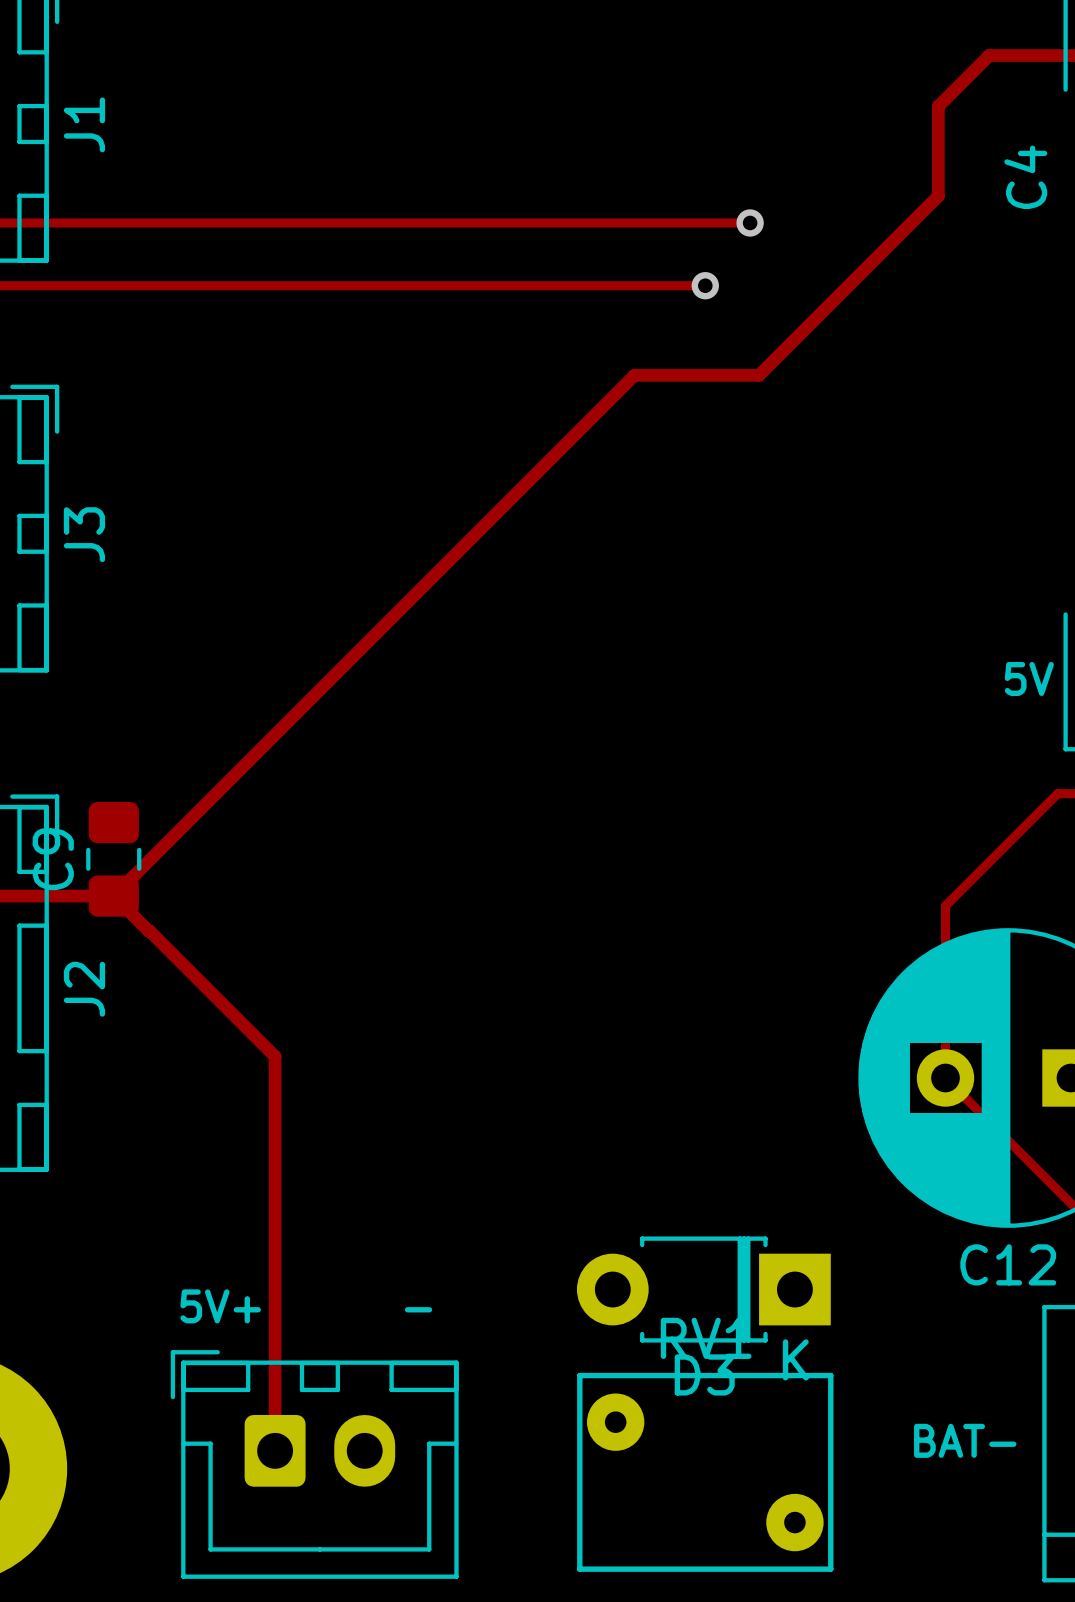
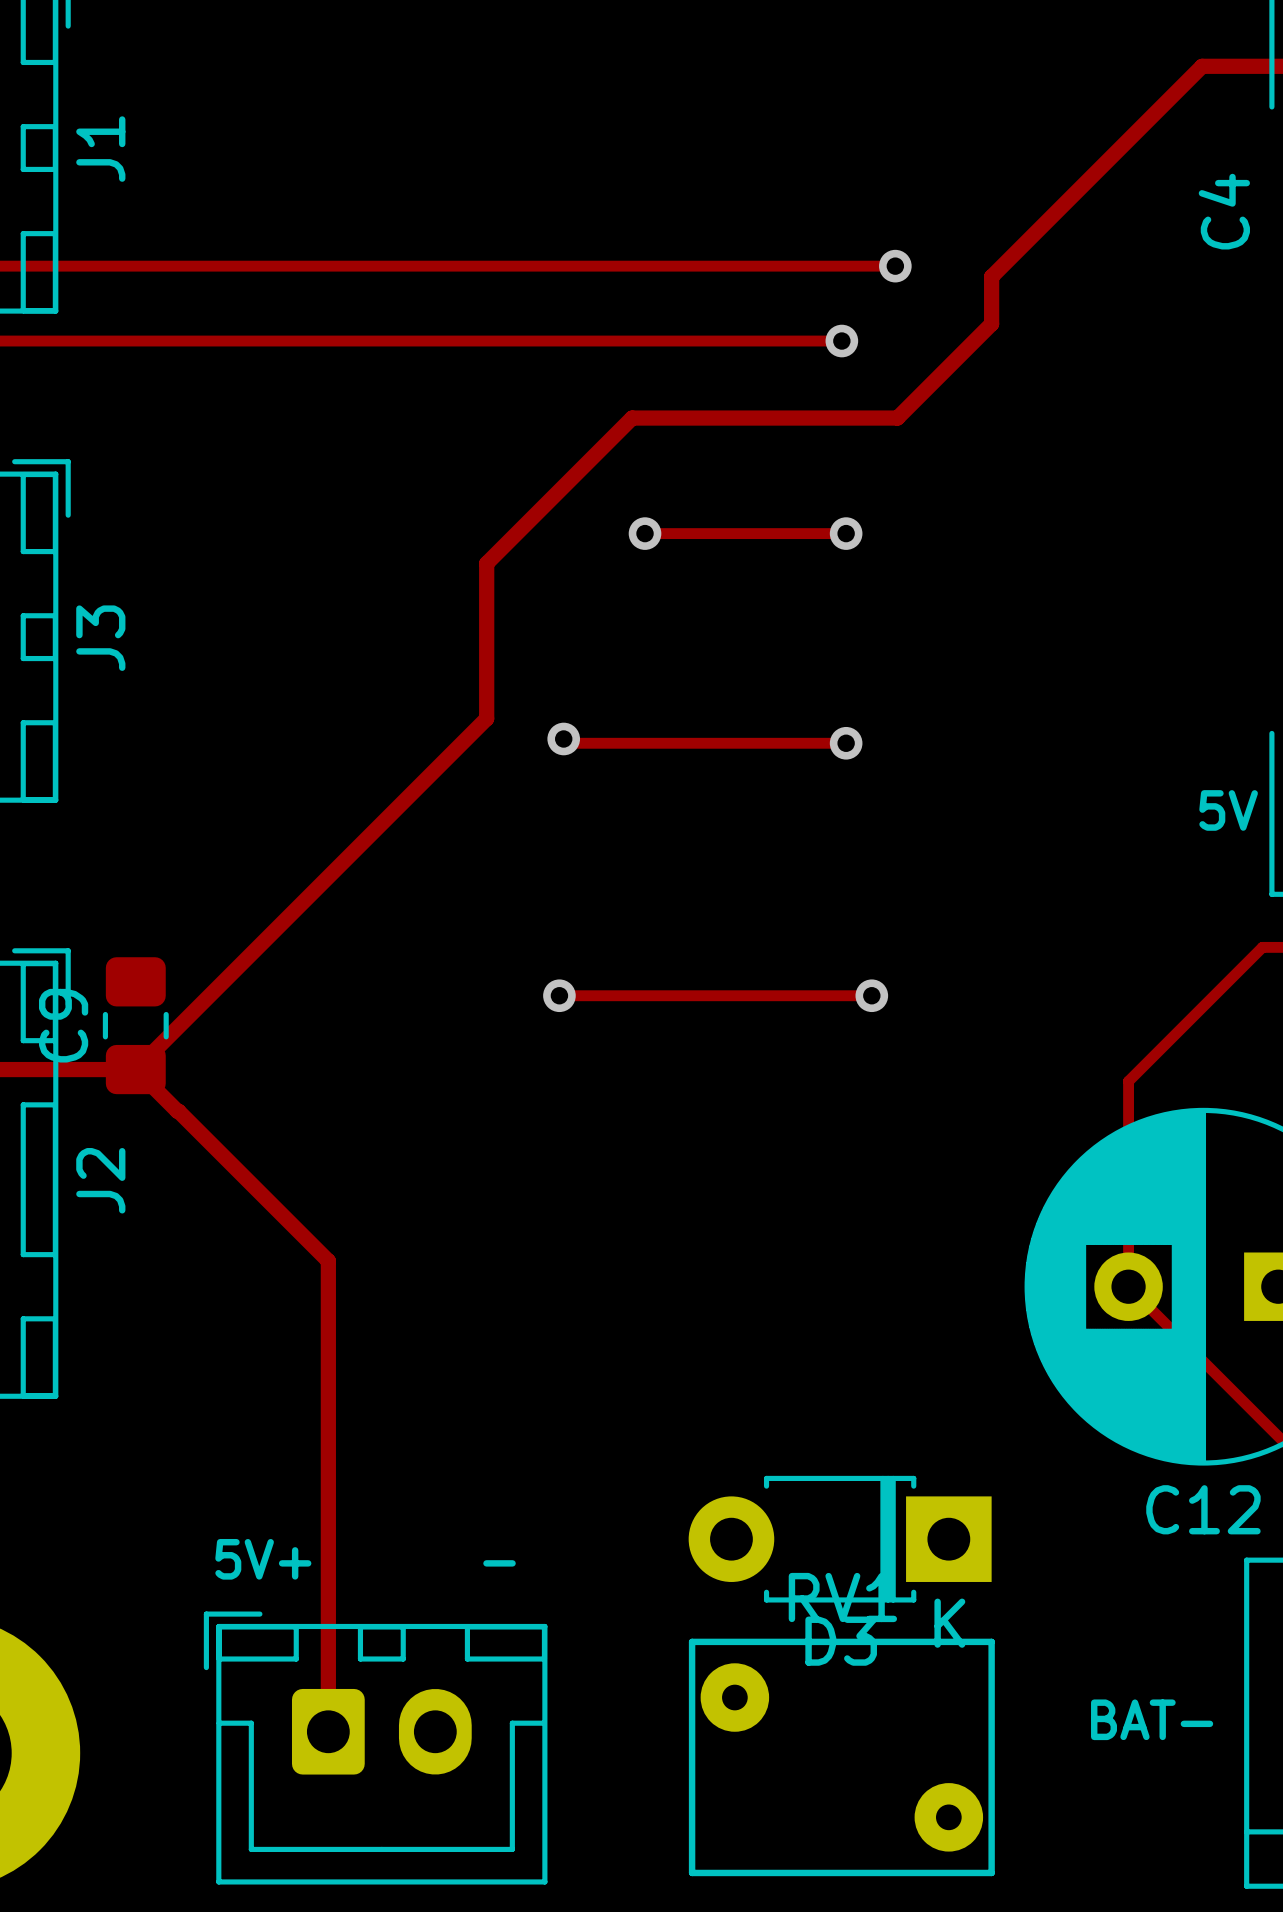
track: (1007, 55) (989, 55) (938, 106) (938, 196) (759, 375) (634, 375) (407, 602) -> (1202, 66) (991, 276) (991, 323) (897, 418) (632, 418) (486, 563) (486, 718)
track: none -> (645, 533) (846, 533)
via: none -> (645, 533)
via: none -> (846, 533)
track: none -> (563, 738) (567, 743) (846, 743)
via: none -> (563, 738)
via: none -> (846, 743)
track: none -> (559, 995) (871, 995)
via: none -> (559, 995)
via: none -> (871, 995)

